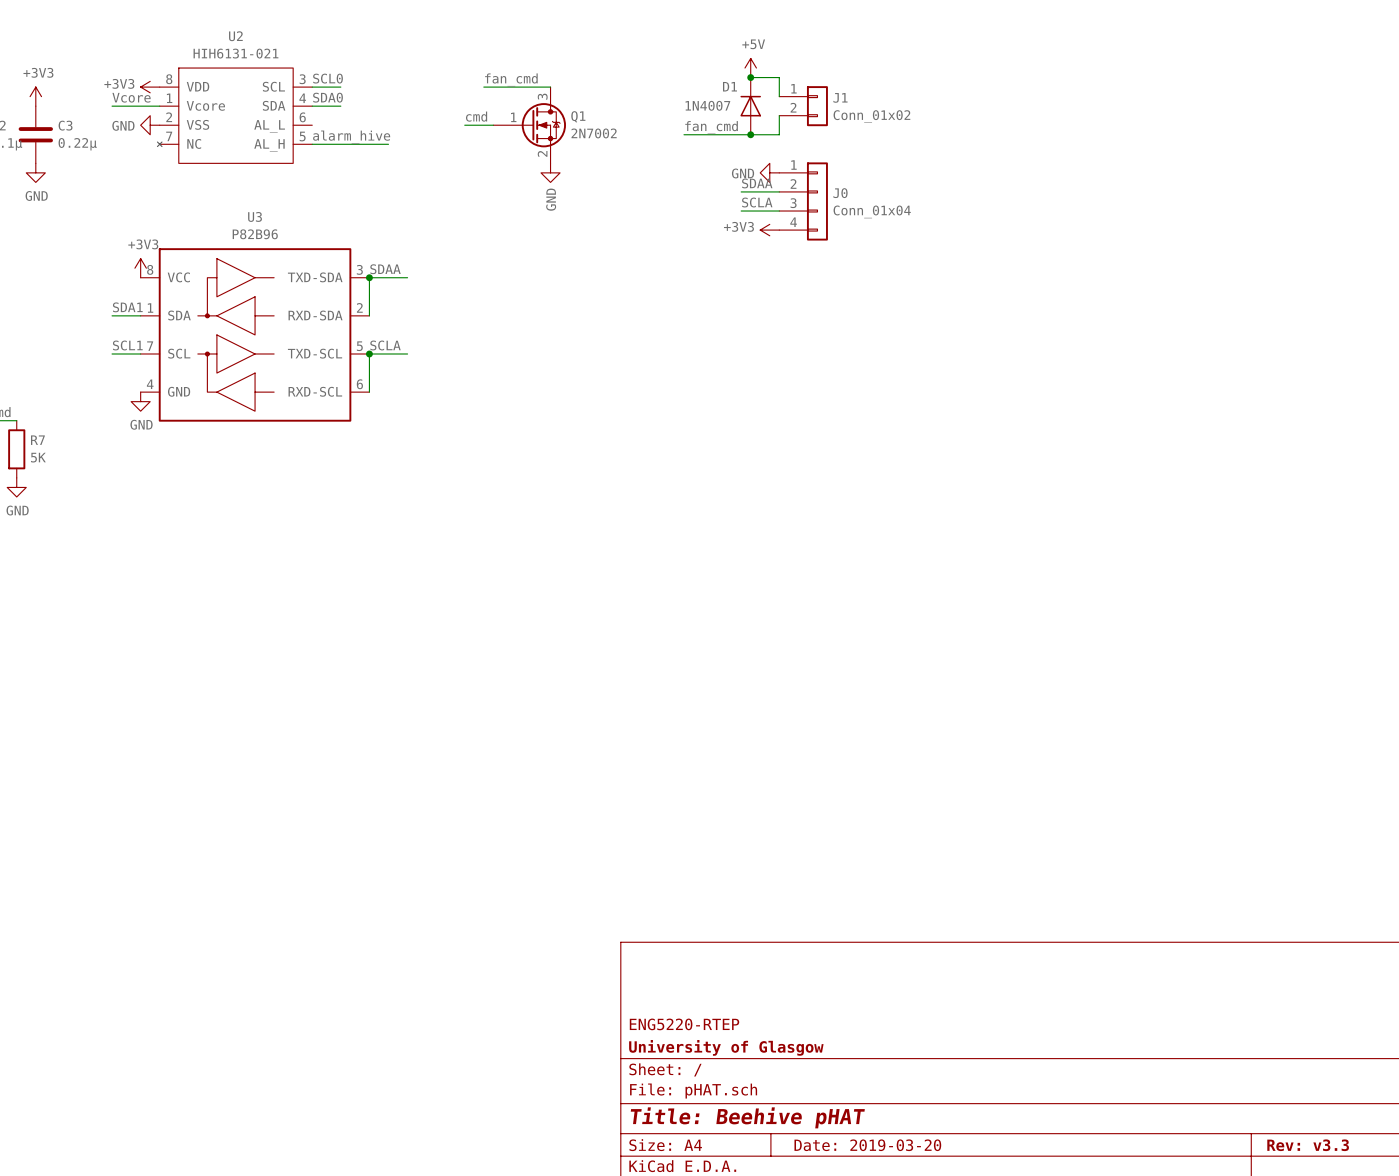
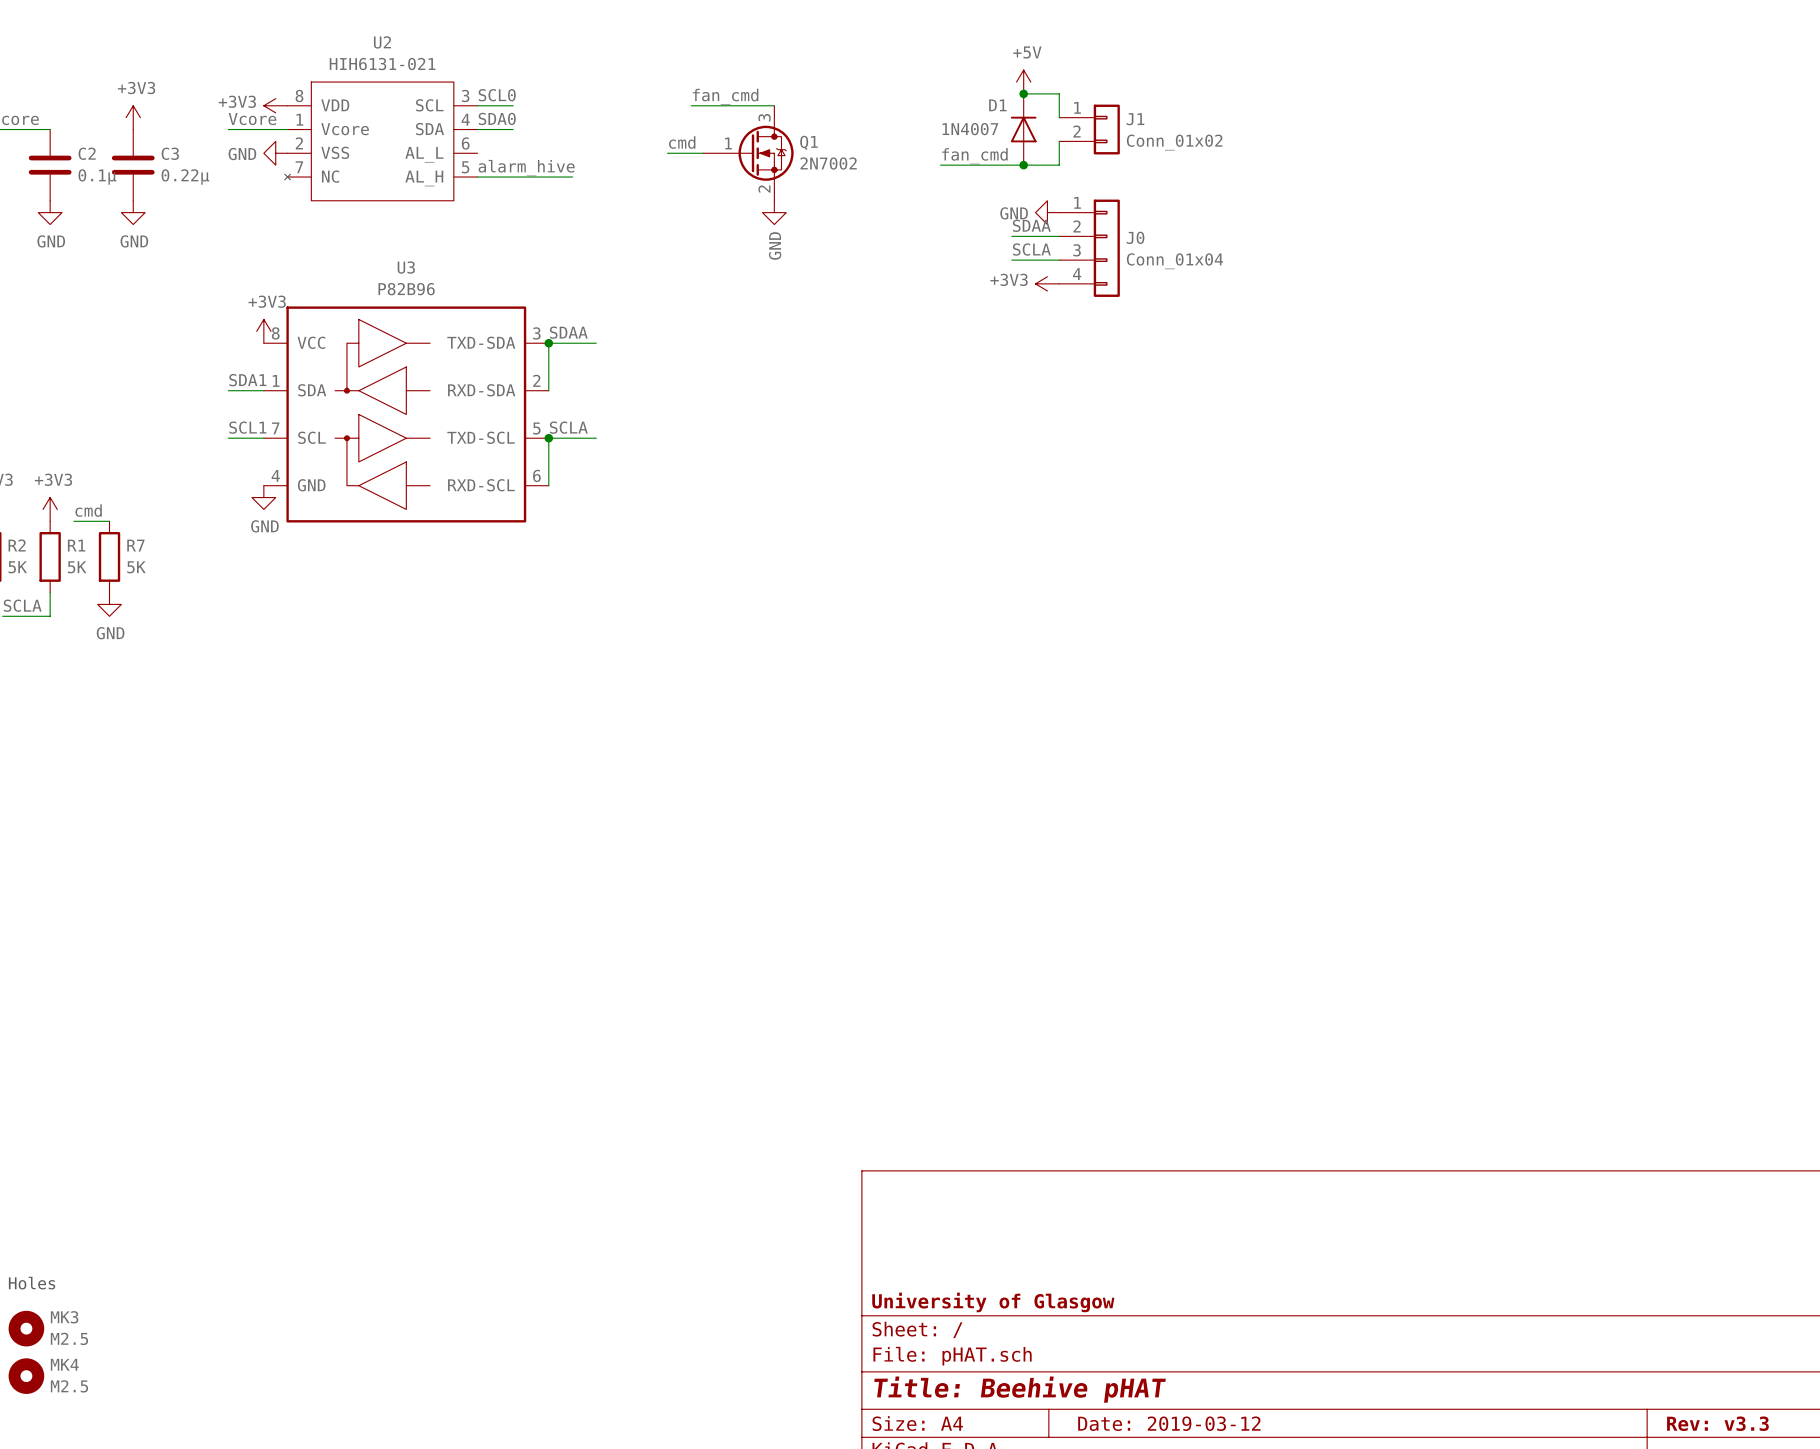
title block: ENG5220-RTEP (684, 1024) -> none
title block: Date: 2019-03-20 (867, 1145) -> Date: 2019-03-12 (1169, 1423)

